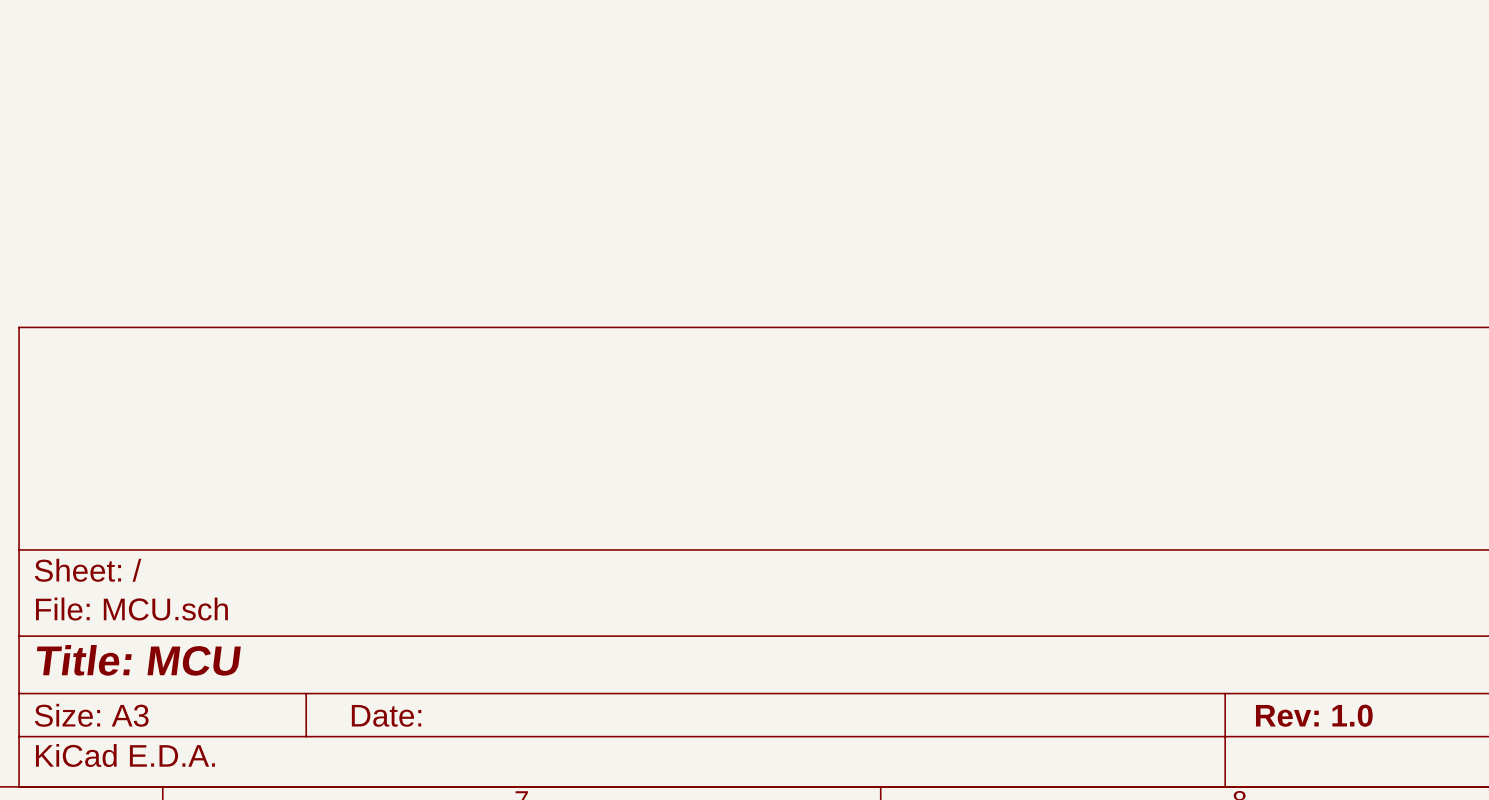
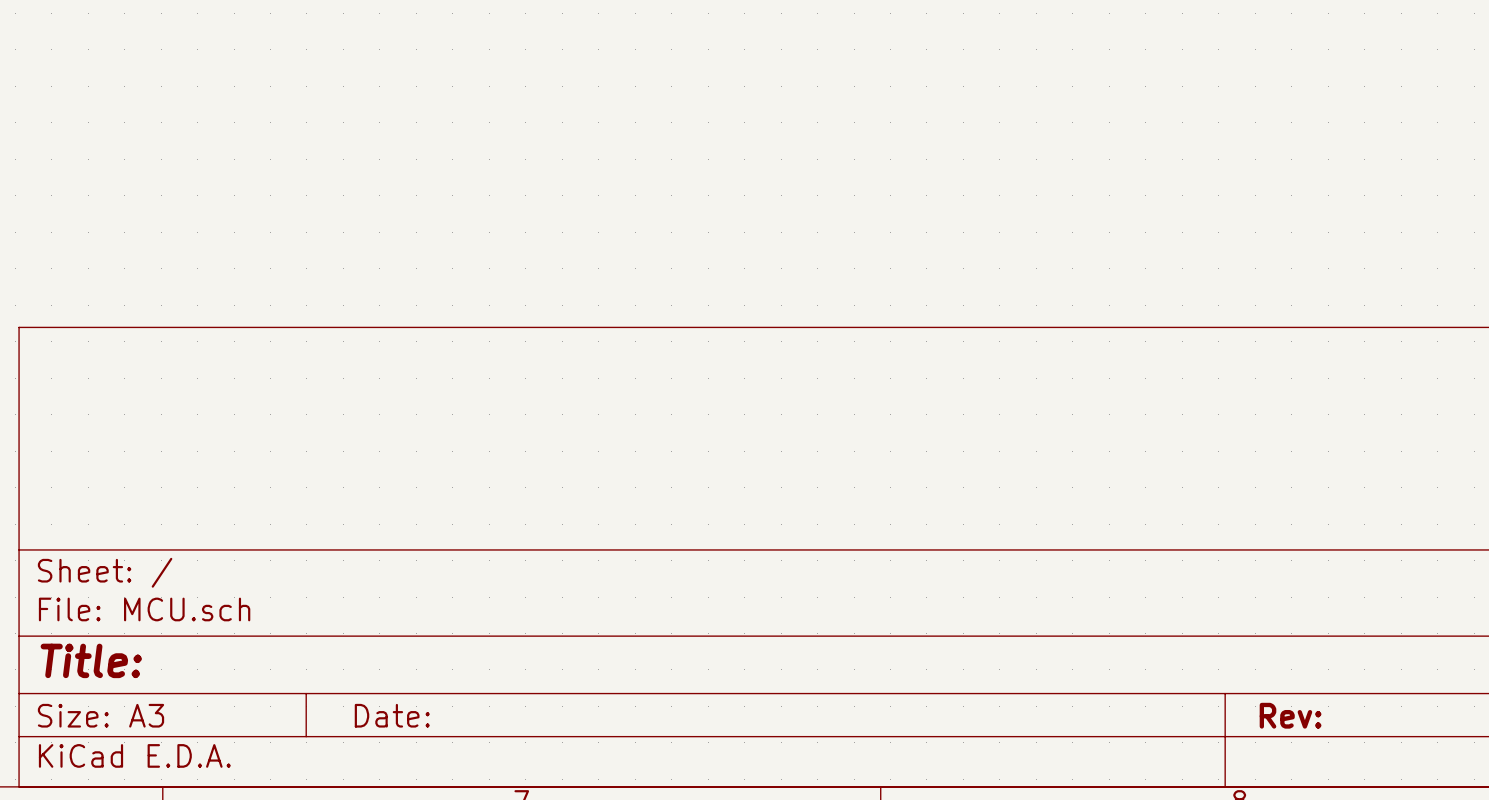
title block: Title: MCU (138, 660) -> Title: (91, 660)
title block: Rev: 1.0 (1314, 715) -> Rev: (1290, 715)

